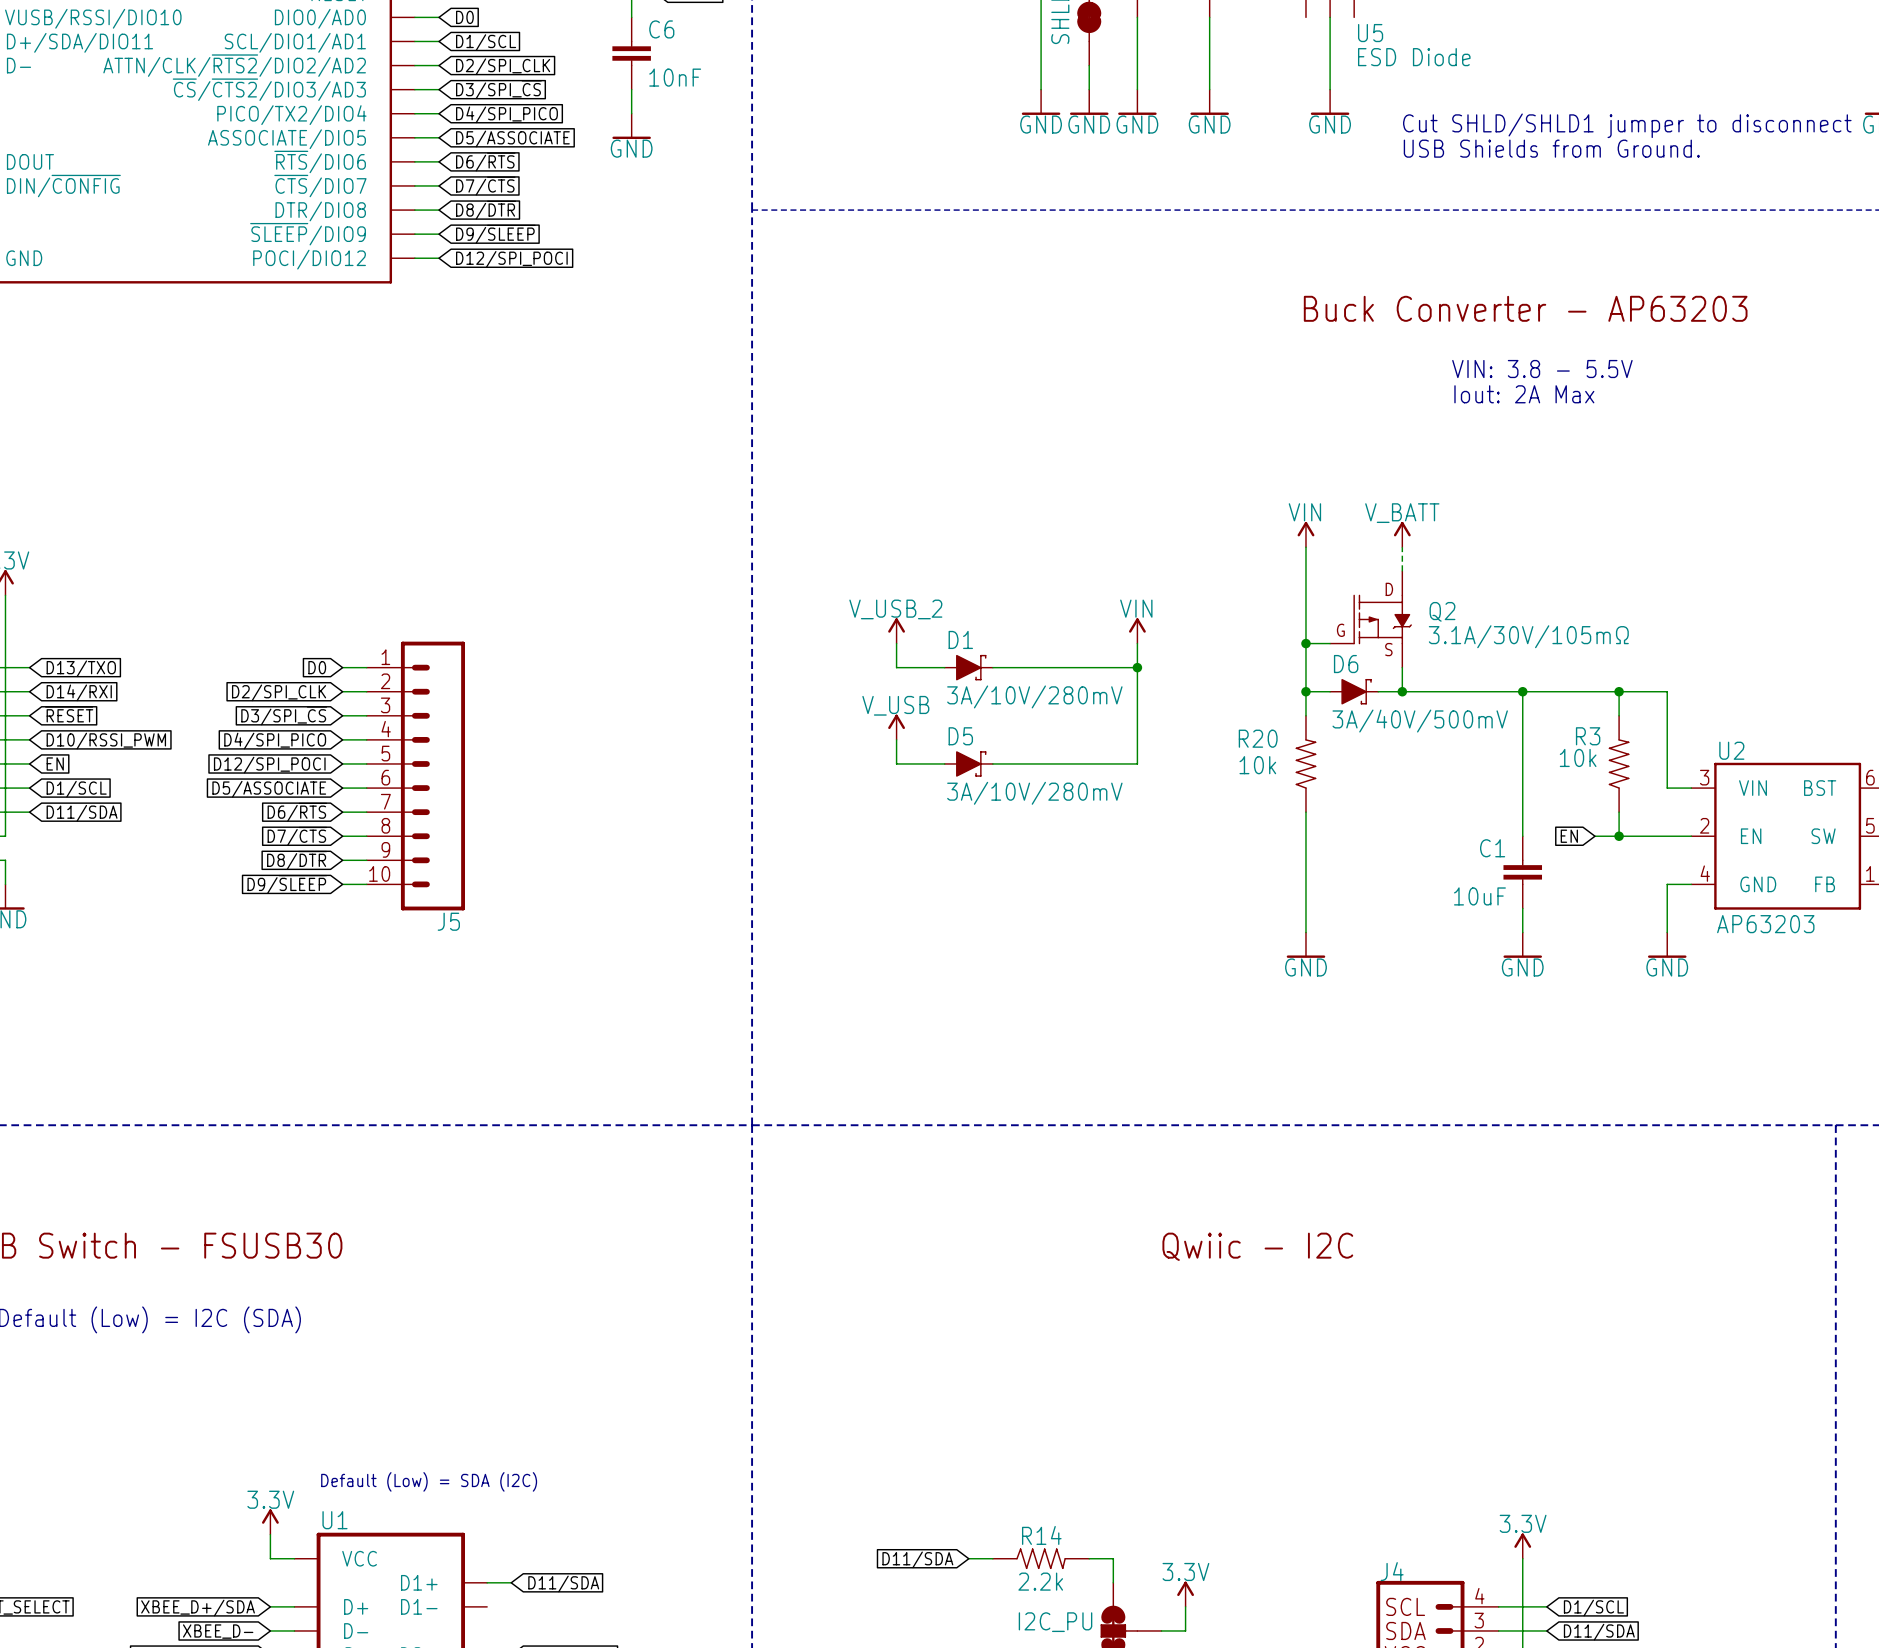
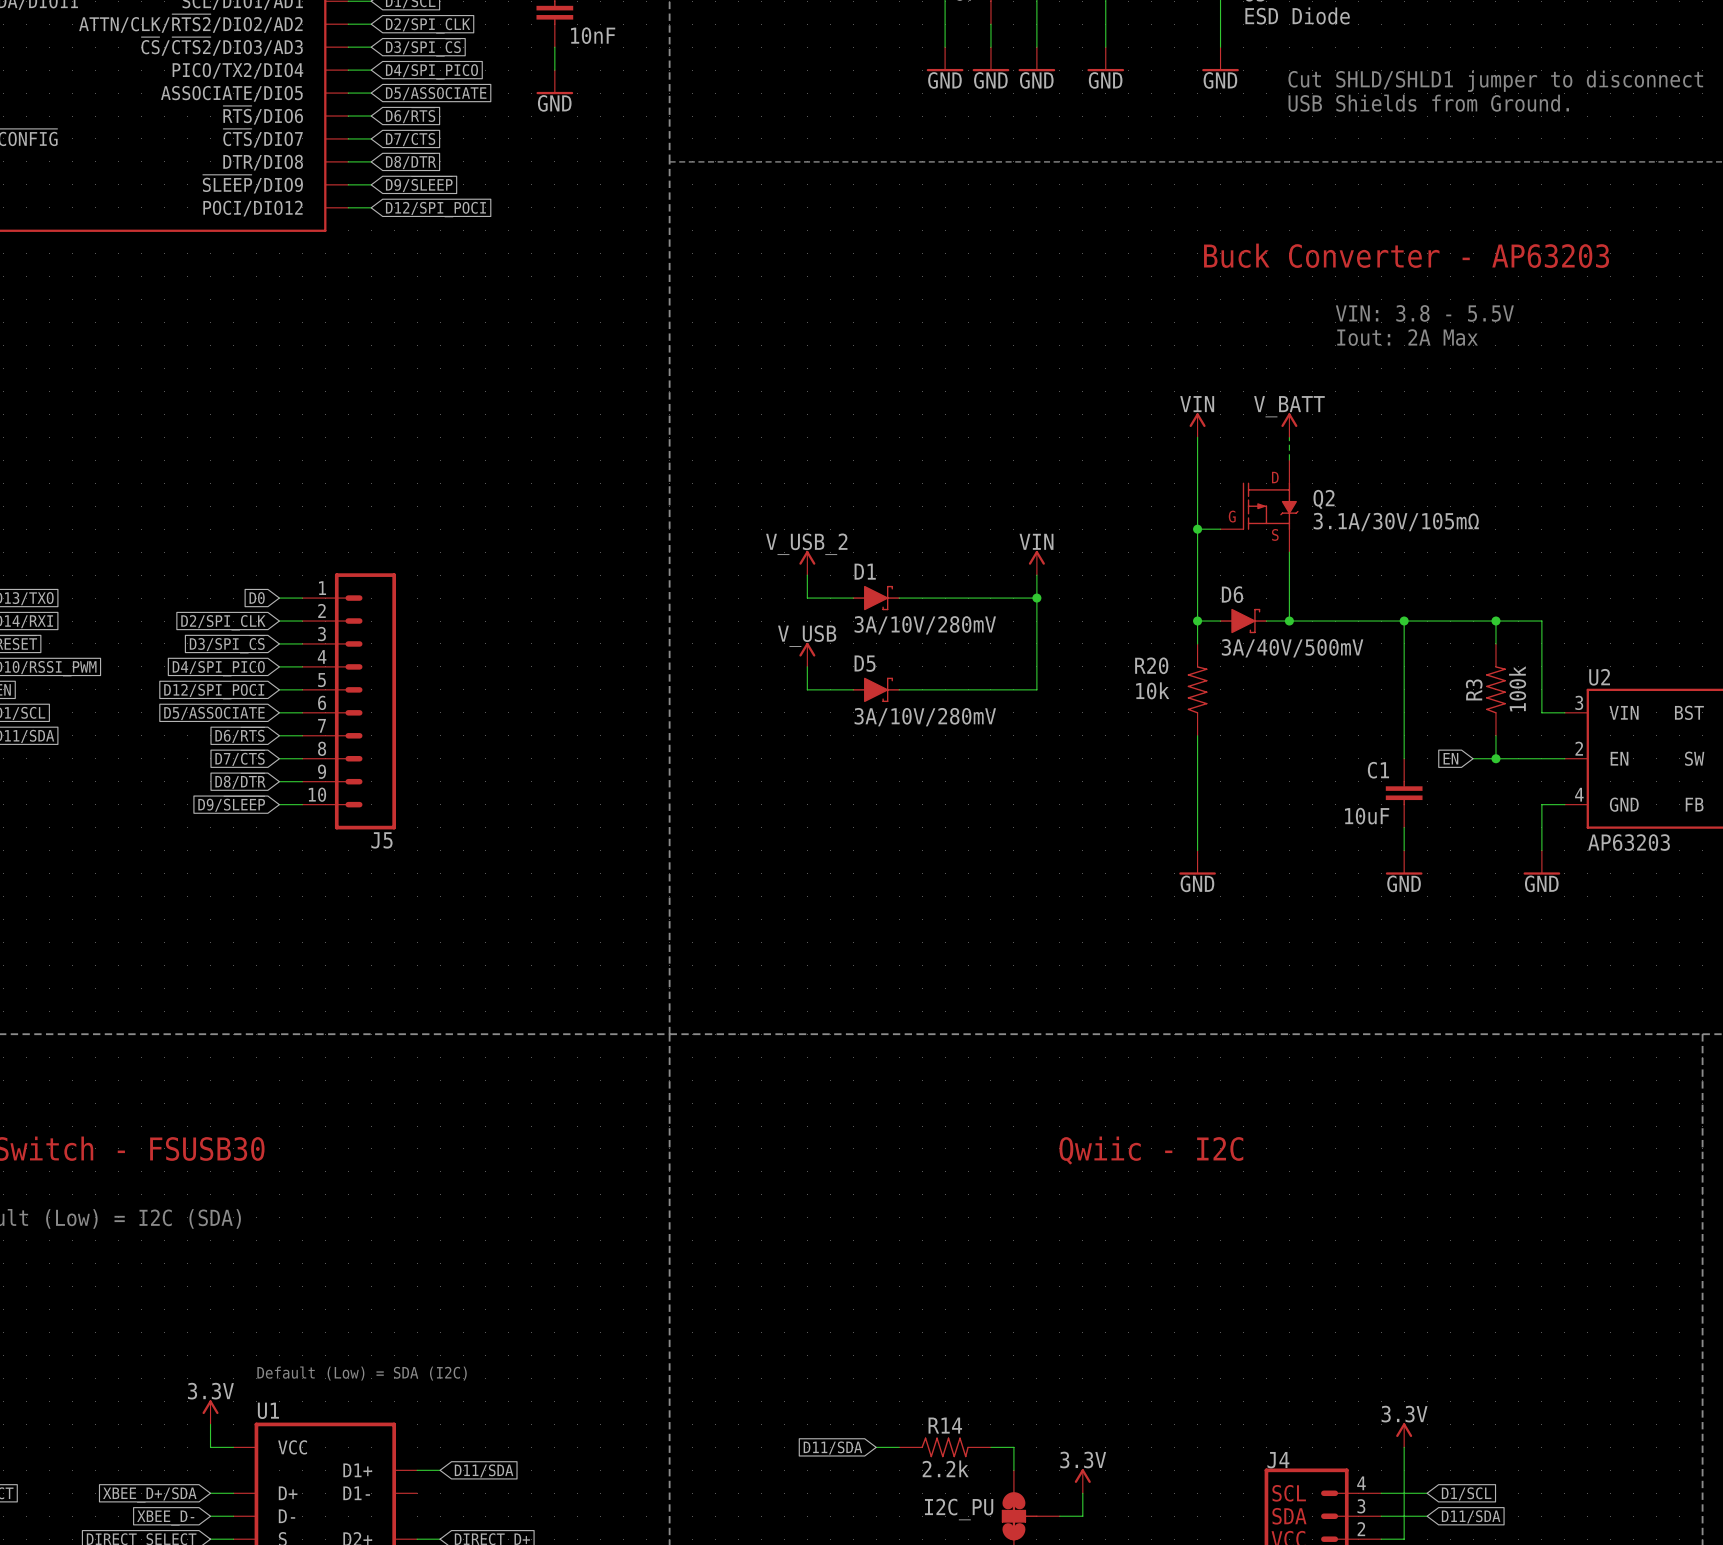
power symbol position: VIN (1305, 534) -> VIN (1197, 425)
power symbol position: V_BATT (1402, 534) -> V_BATT (1289, 425)
Q2 position: (1371, 619) -> (1259, 506)
wire: (1305, 643) (1330, 643) -> (1197, 529) (1220, 529)
junction position: (1305, 643) -> (1197, 529)
R3 name rotation: 0° (1588, 736) -> 90° counterclockwise (1474, 689)
R3 value: 10k (1578, 757) -> 100k (1517, 688)

